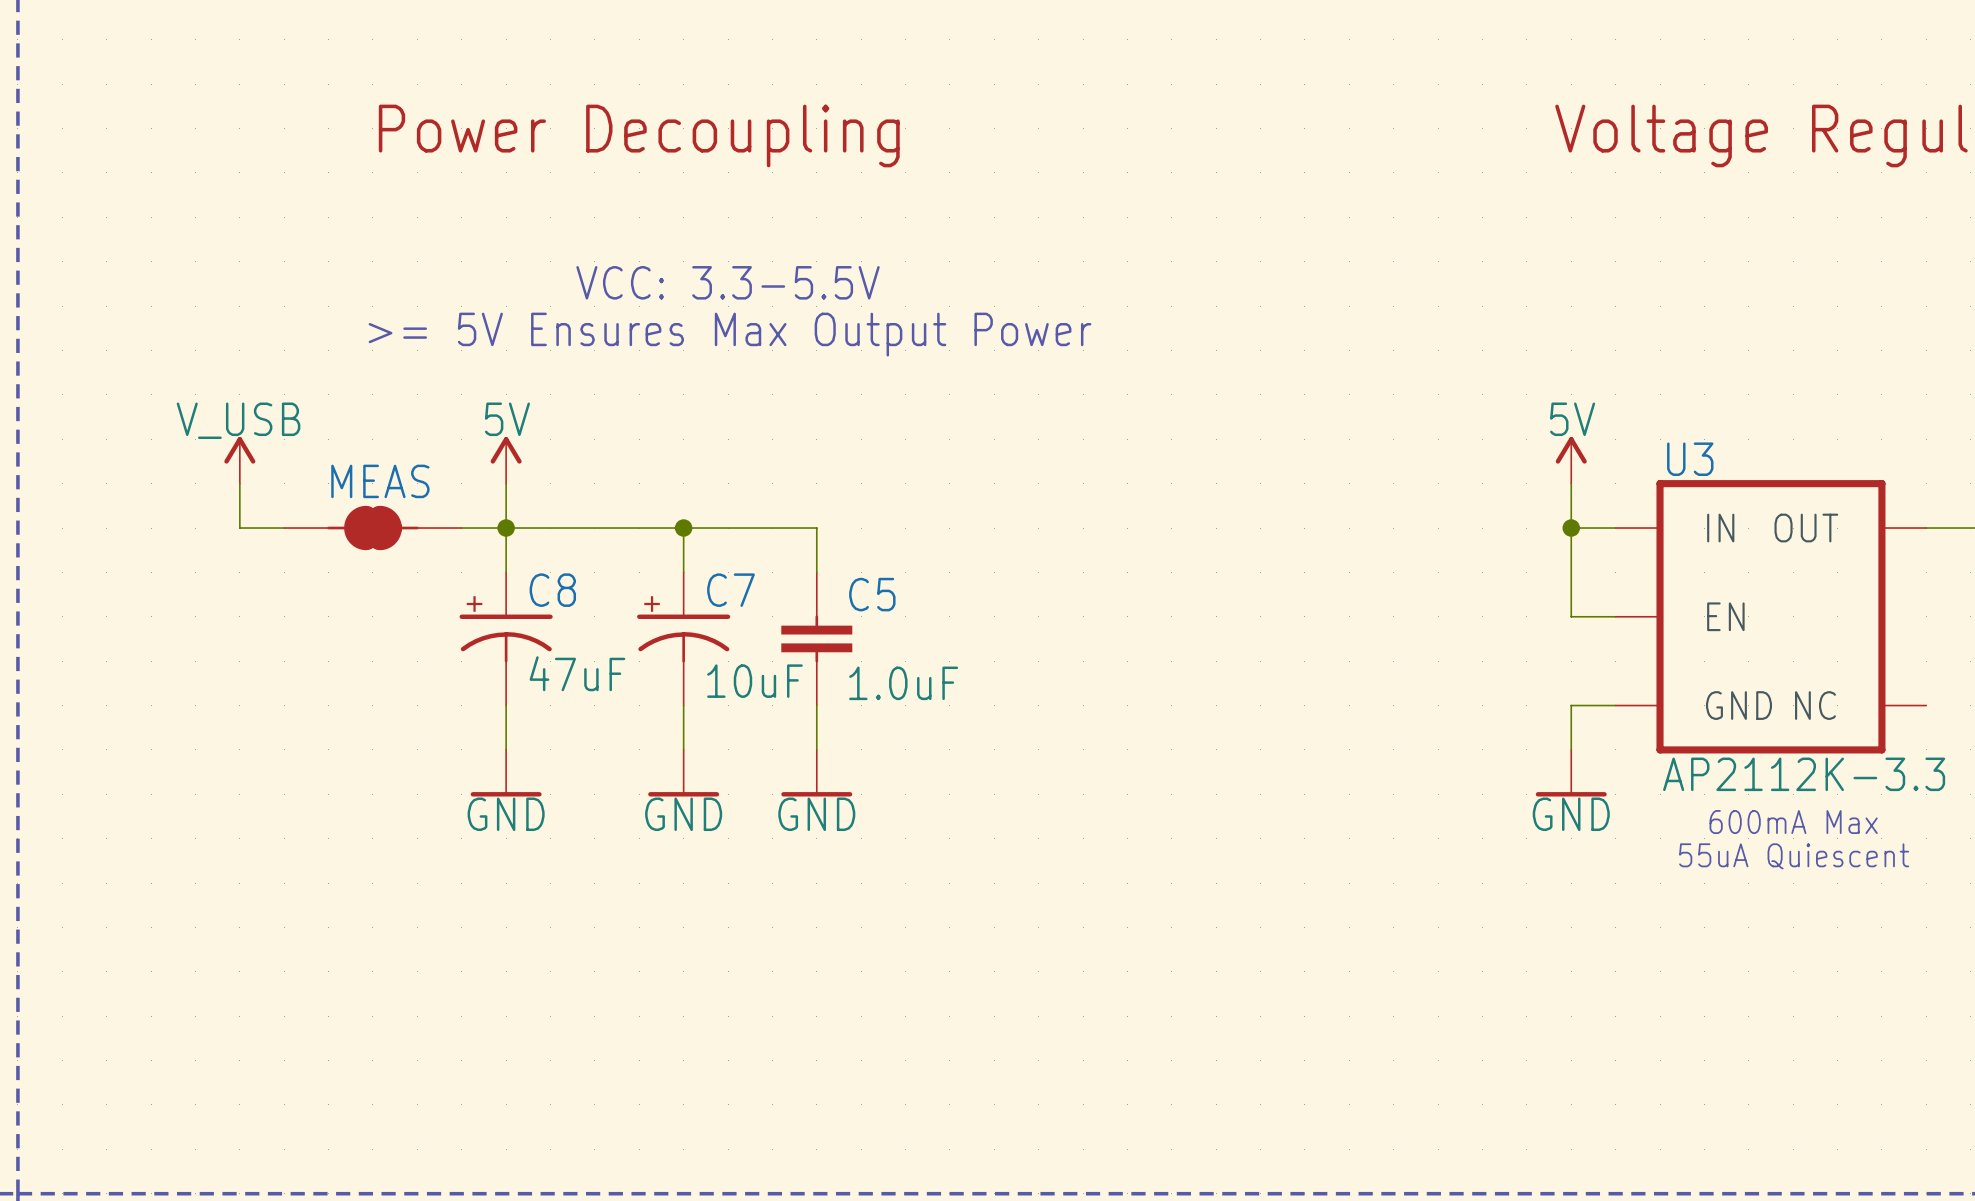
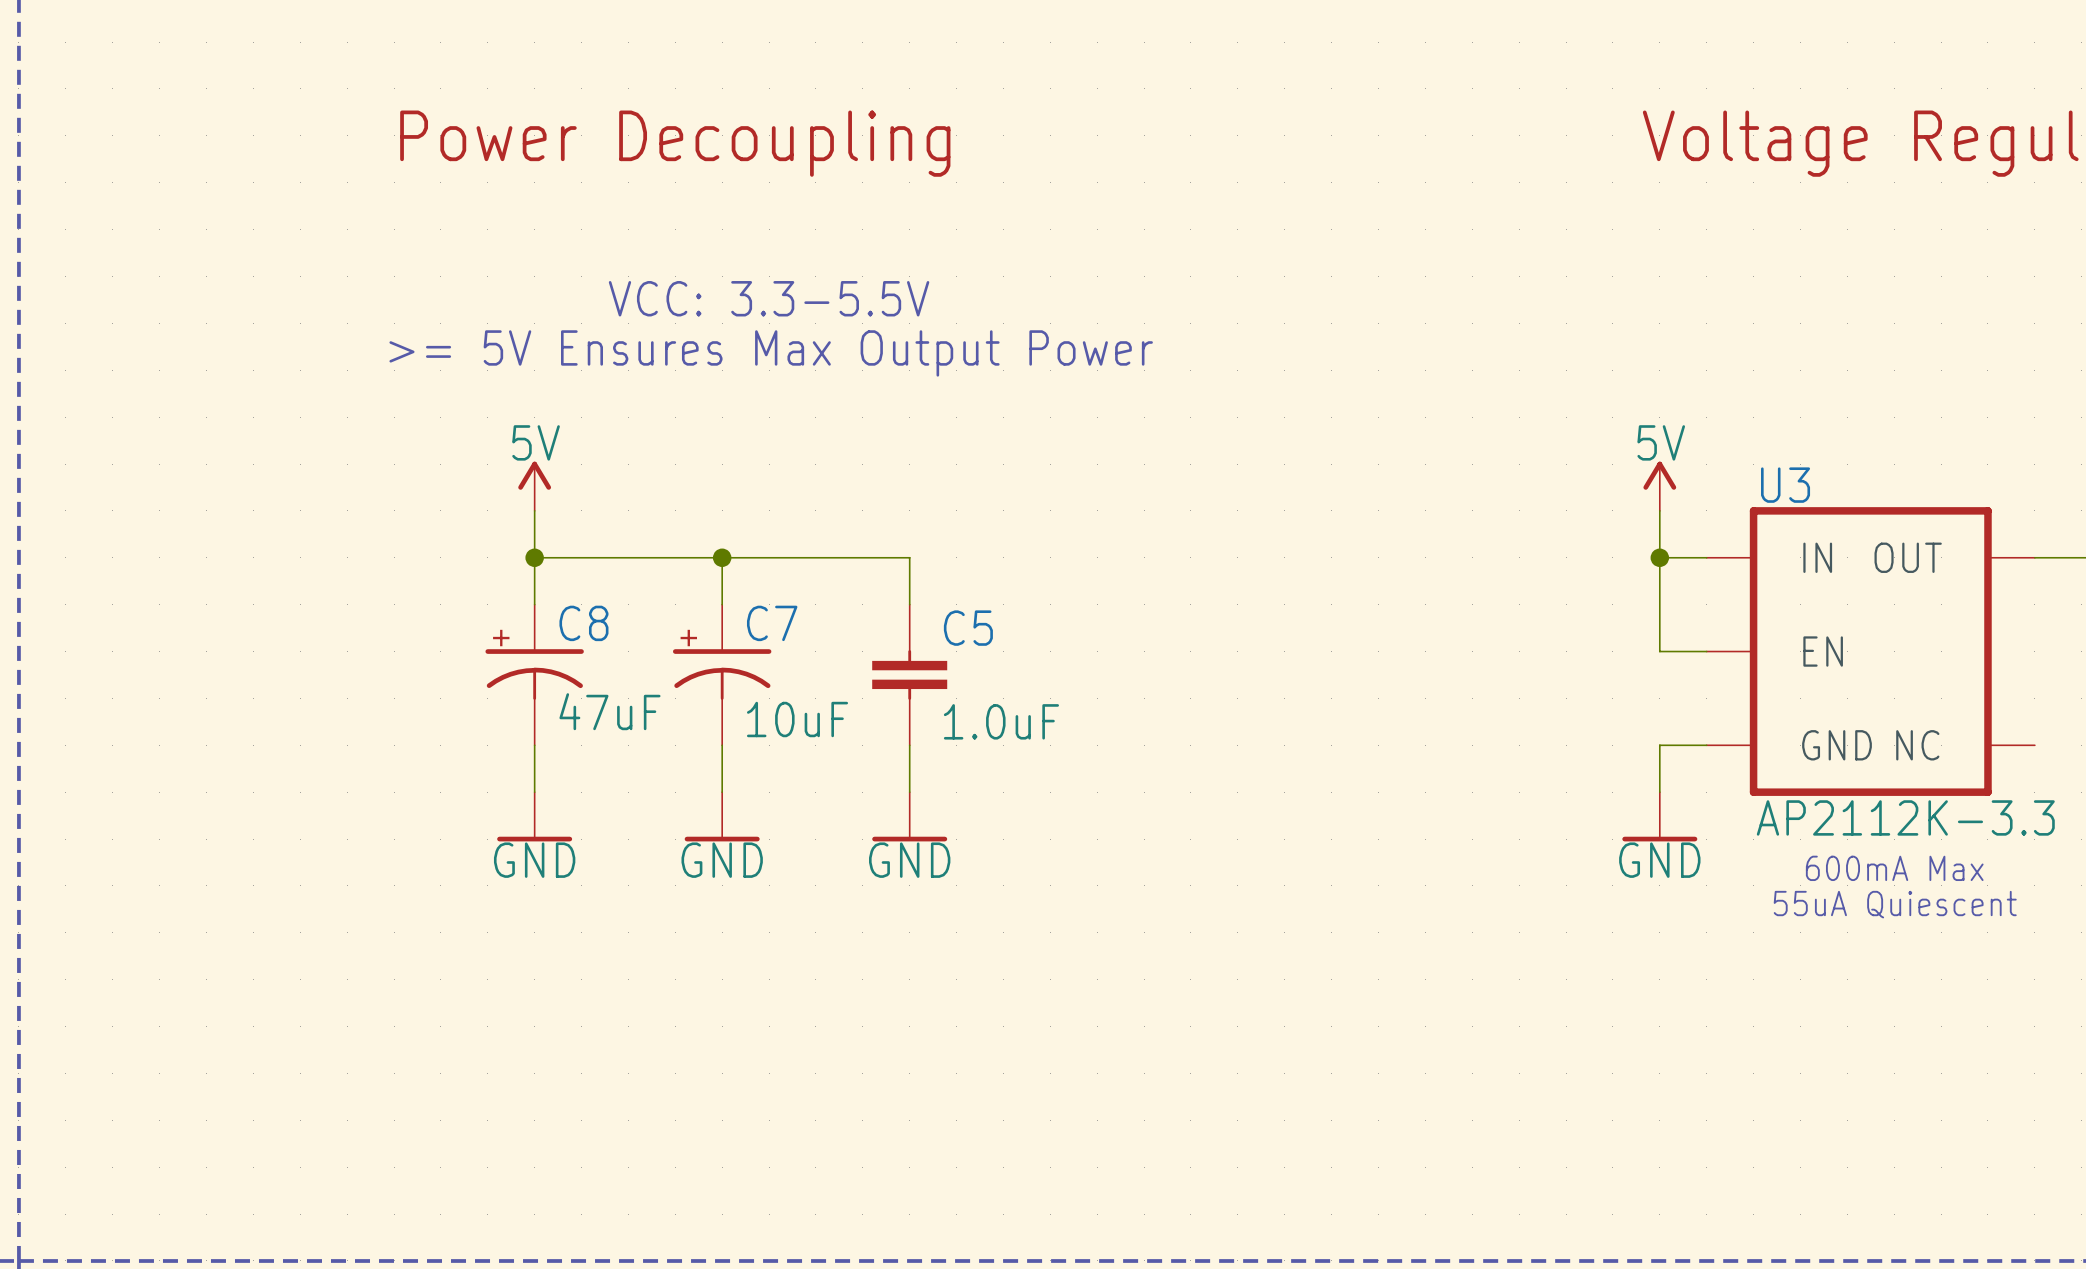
power symbol: V_USB (239, 460) -> none
wire: (239, 483) (239, 528) (284, 528) -> none
MEAS: (372, 528) -> none
wire: (461, 528) (506, 528) -> none
wire: (816, 528) (816, 572) -> (862, 557) (909, 557) (909, 604)
C5 position: (816, 638) -> (909, 674)
wire: (816, 705) (816, 749) -> (909, 745) (909, 792)
power symbol position: GND (816, 773) -> GND (909, 816)

